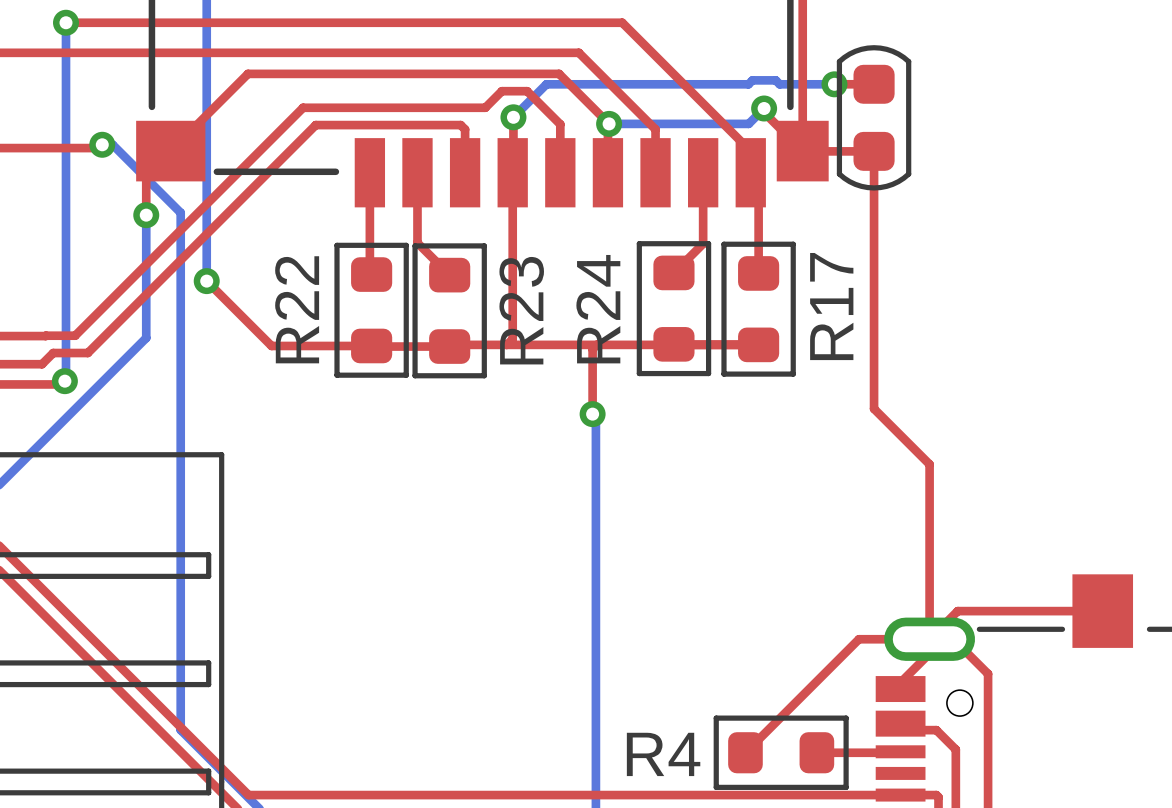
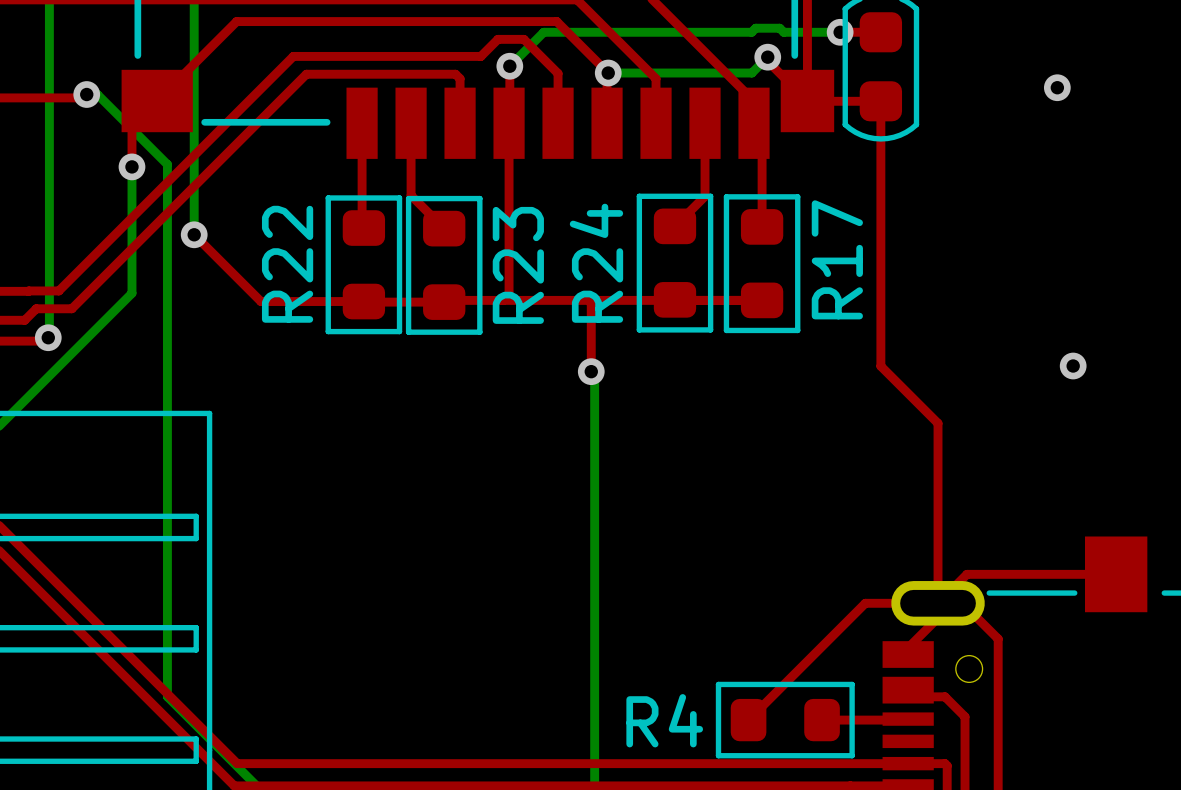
via: none -> (1057, 87)
via: none -> (1073, 366)

